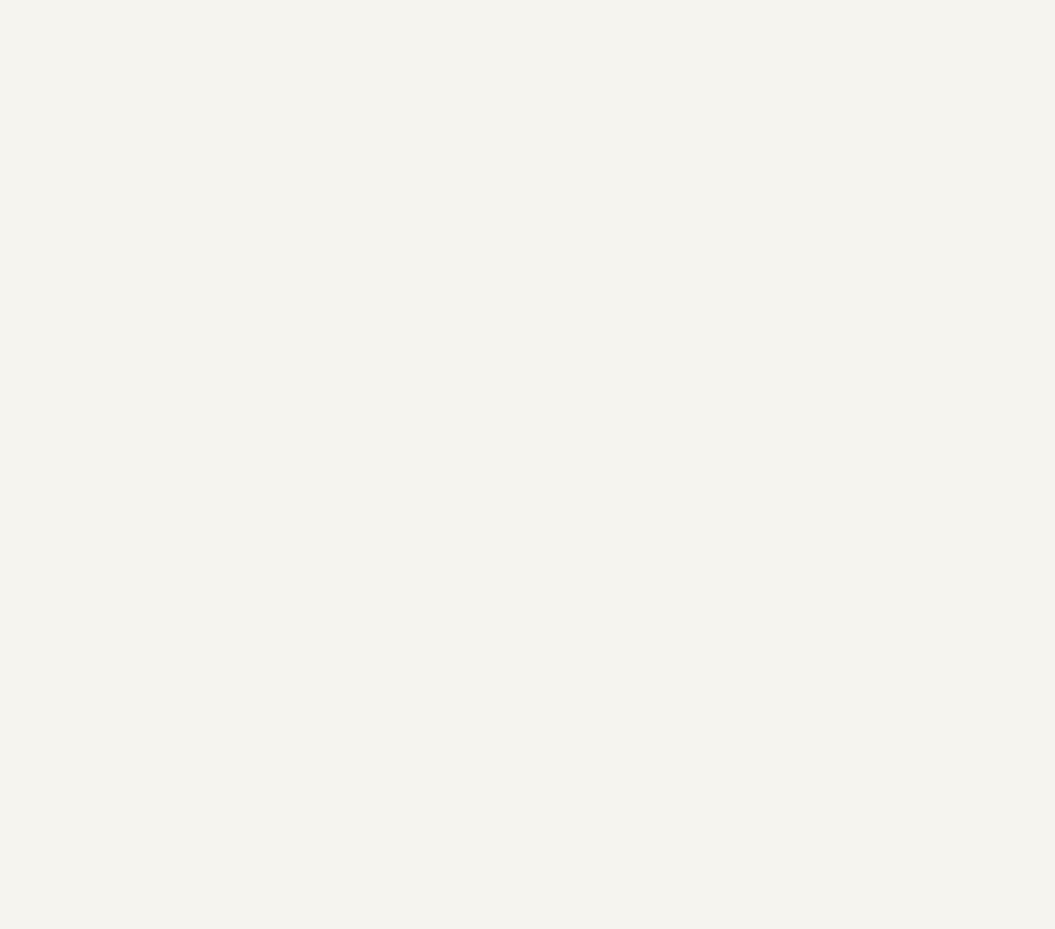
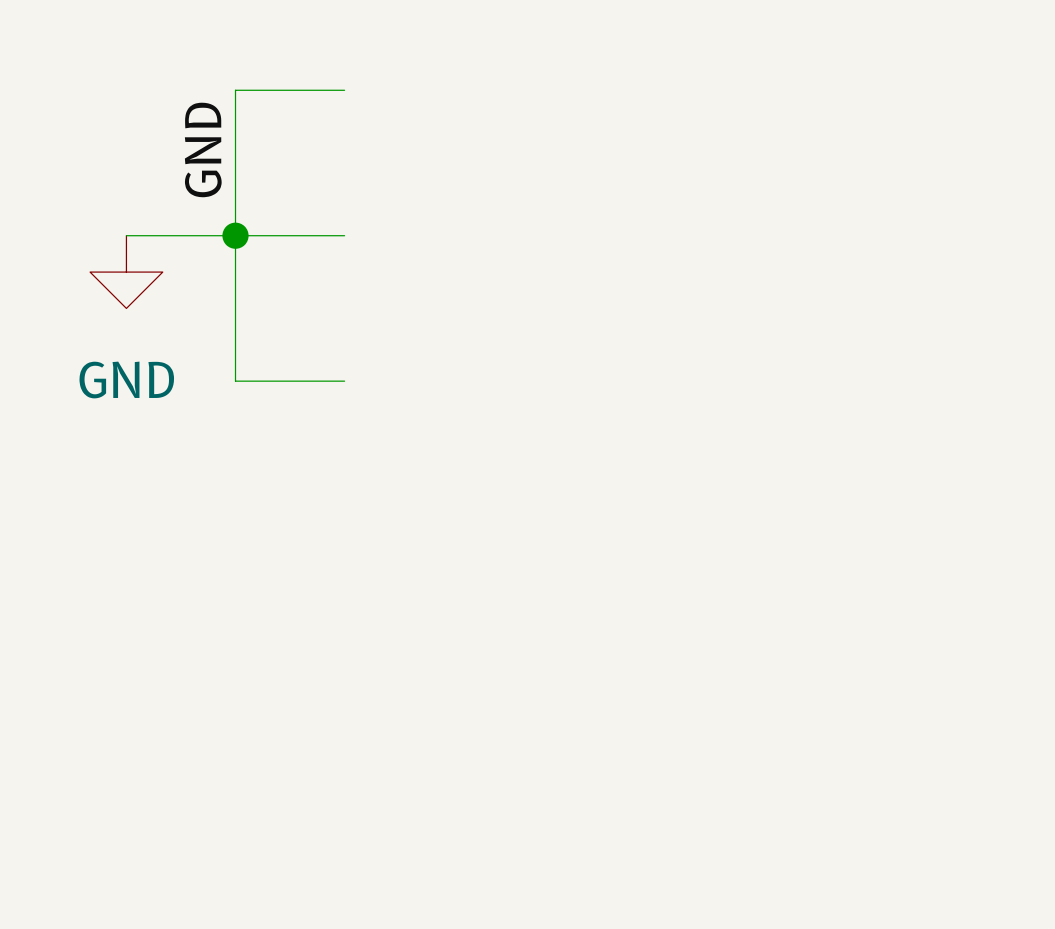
wire: none -> (344, 90) (235, 90) (235, 381) (344, 381)
label: none -> GND (203, 149)
wire: none -> (126, 235) (344, 235)
junction: none -> (235, 235)
power symbol: none -> GND (126, 272)

